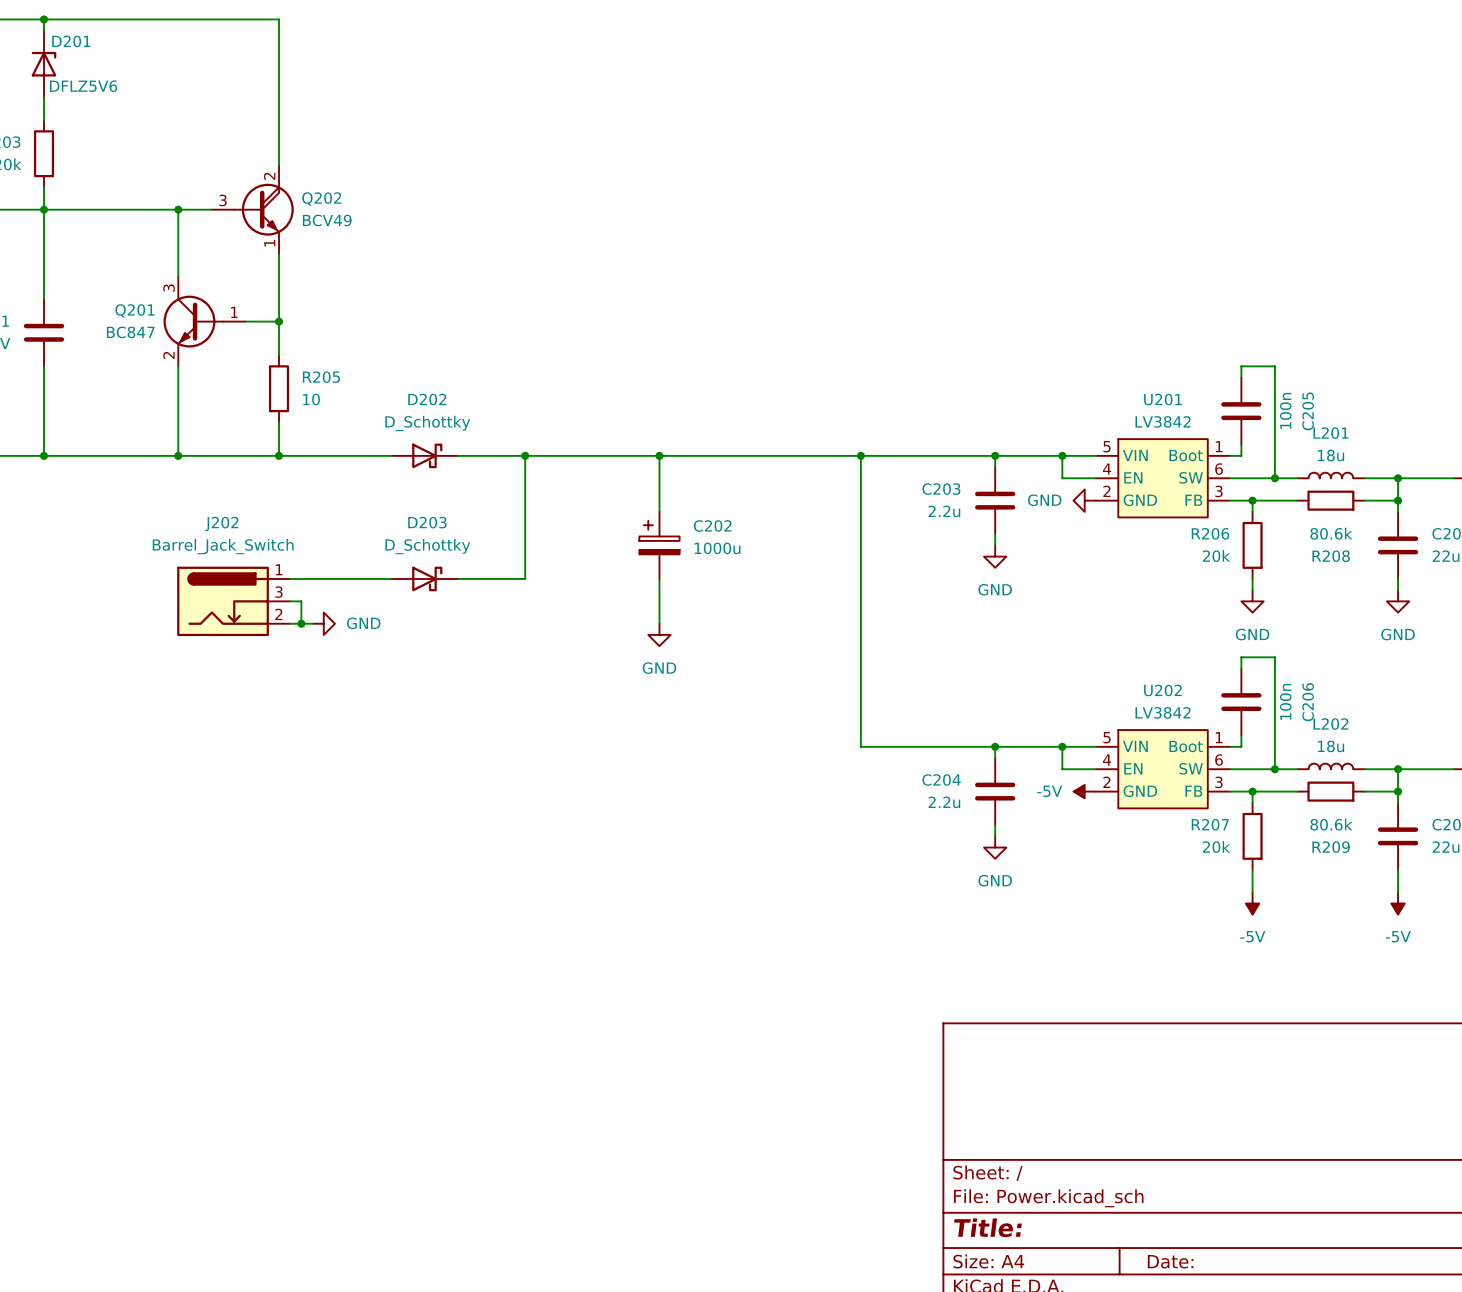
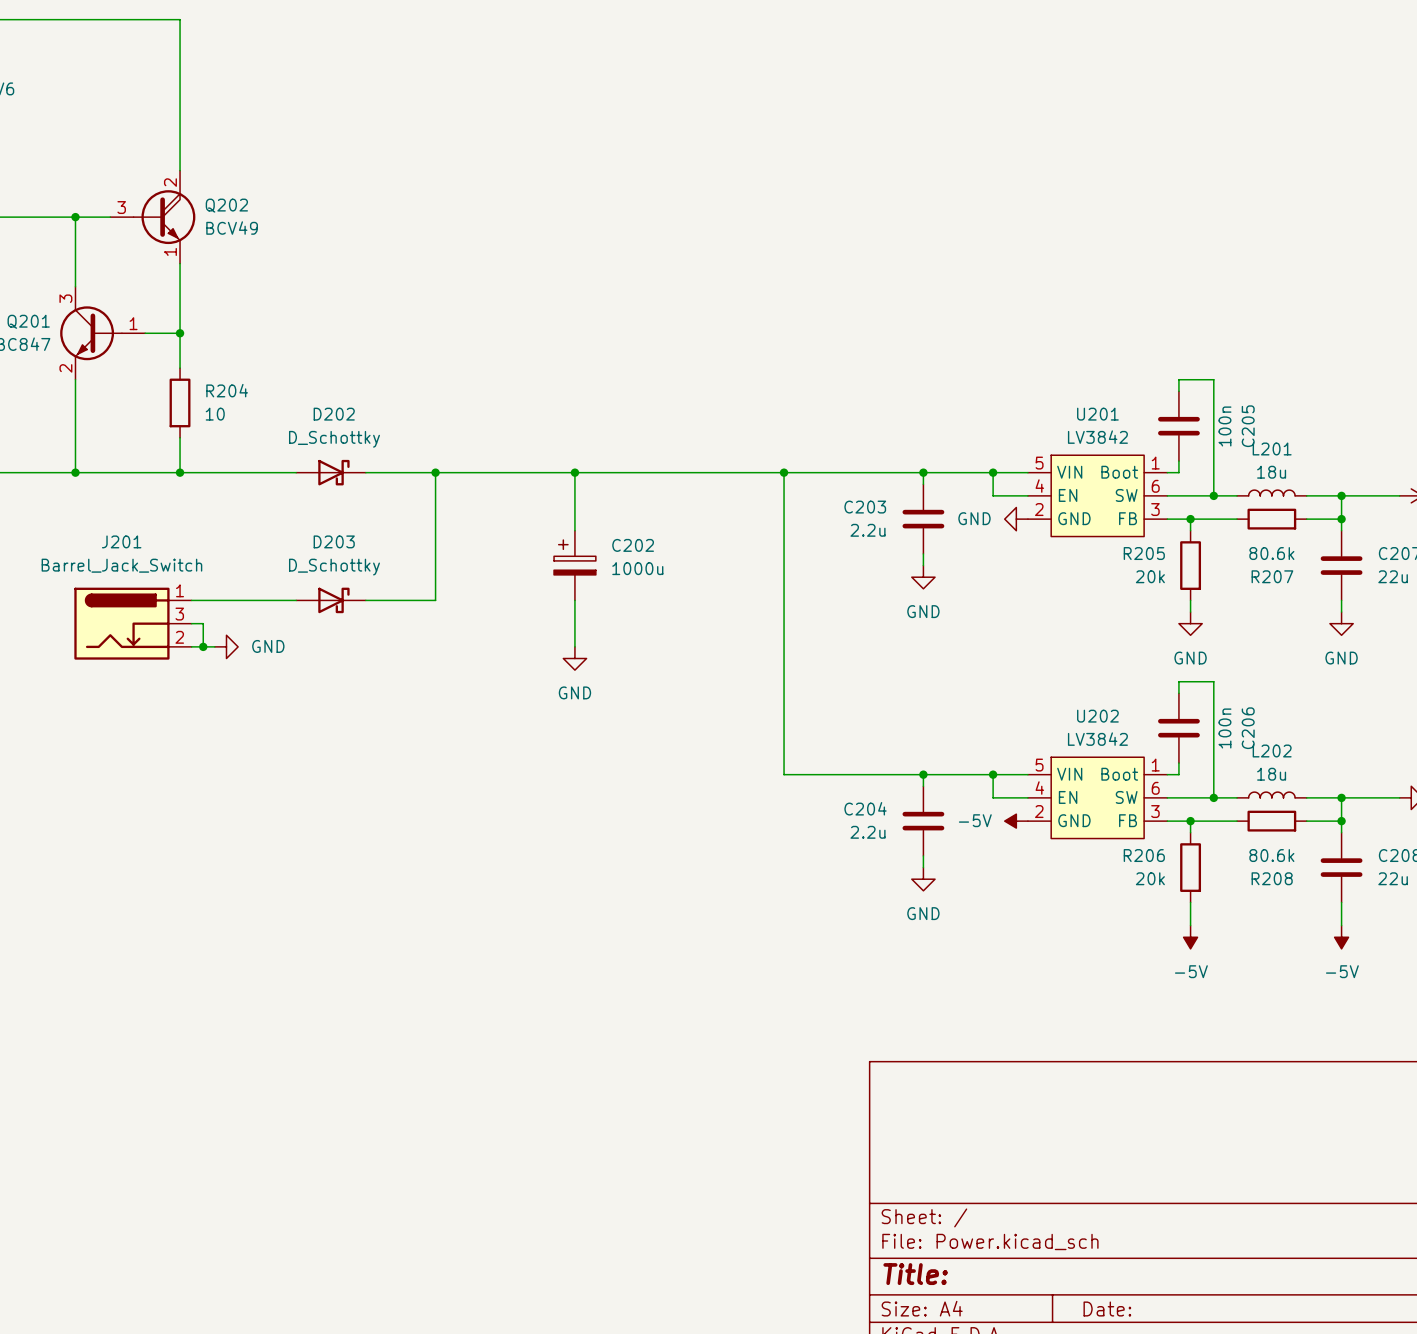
R205 name: R205 (321, 377) -> R204 (227, 390)
J202 name: J202 (221, 524) -> J201 (121, 541)
R206 name: R206 (1210, 533) -> R205 (1144, 553)
R208 name: R208 (1331, 556) -> R207 (1272, 576)
R207 name: R207 (1210, 824) -> R206 (1144, 855)
R209 name: R209 (1331, 847) -> R208 (1272, 878)

